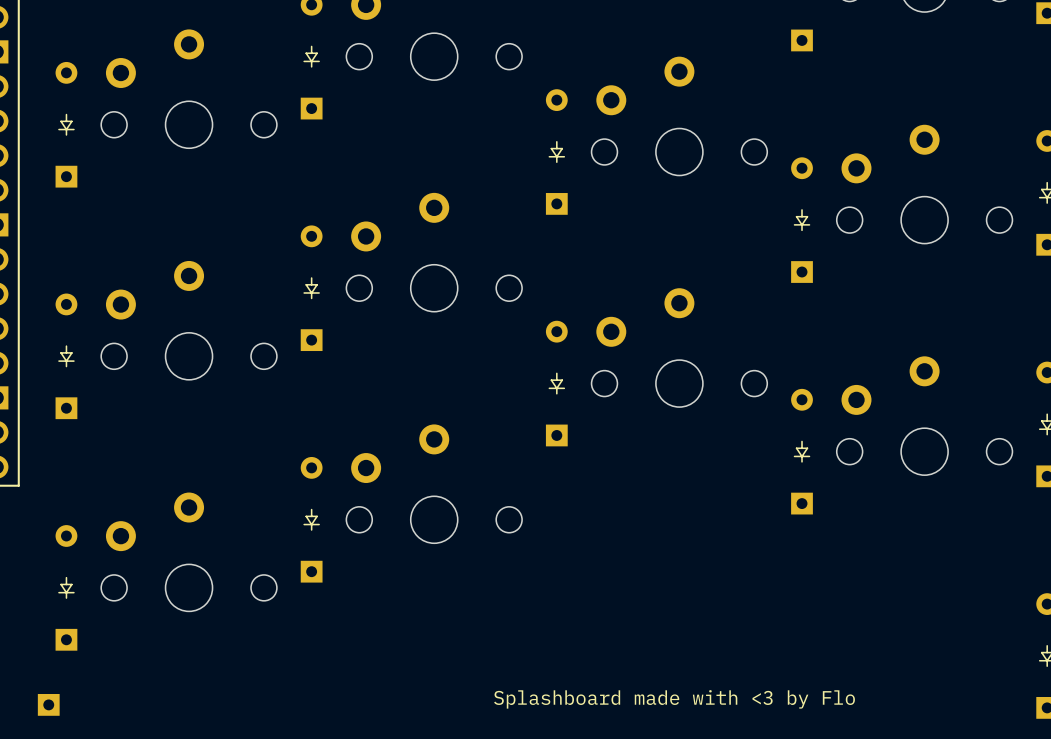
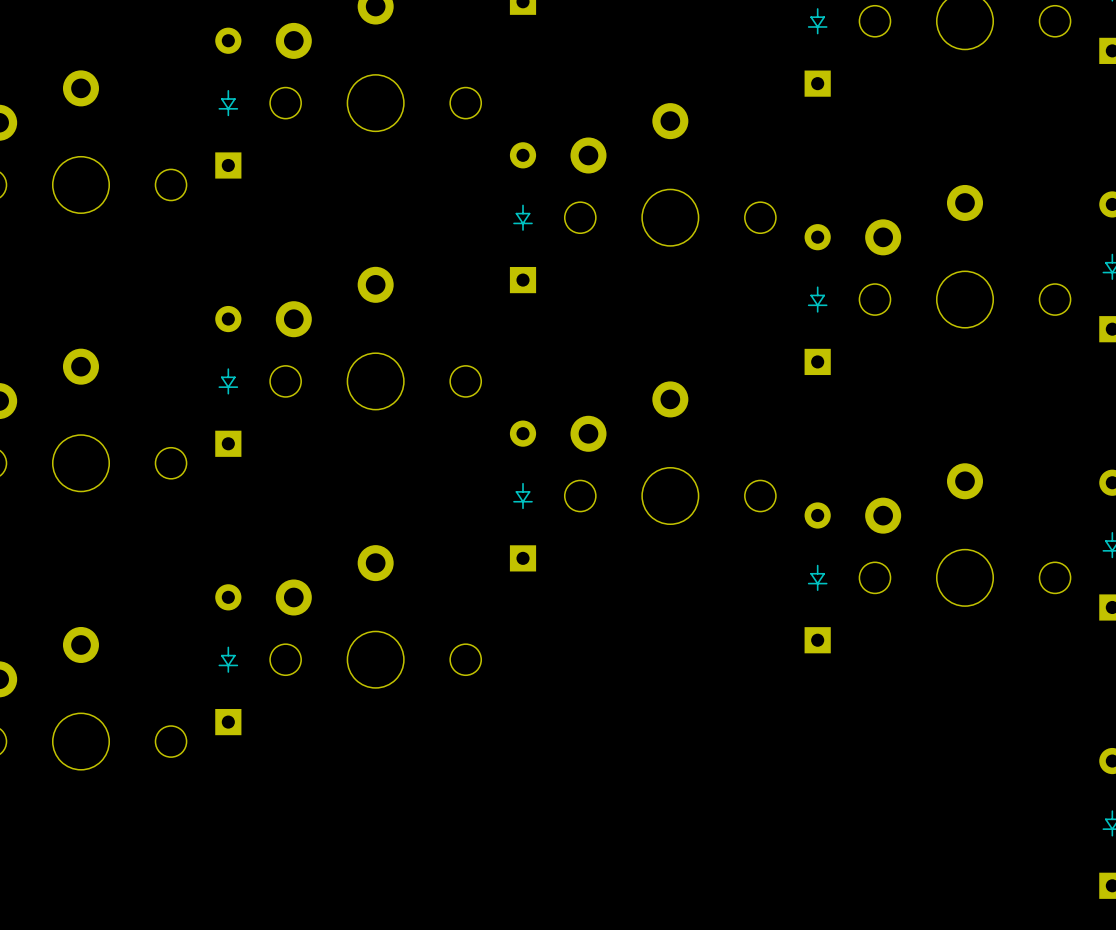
text: Splashboard made with <3 by Flo (674, 699) -> none

